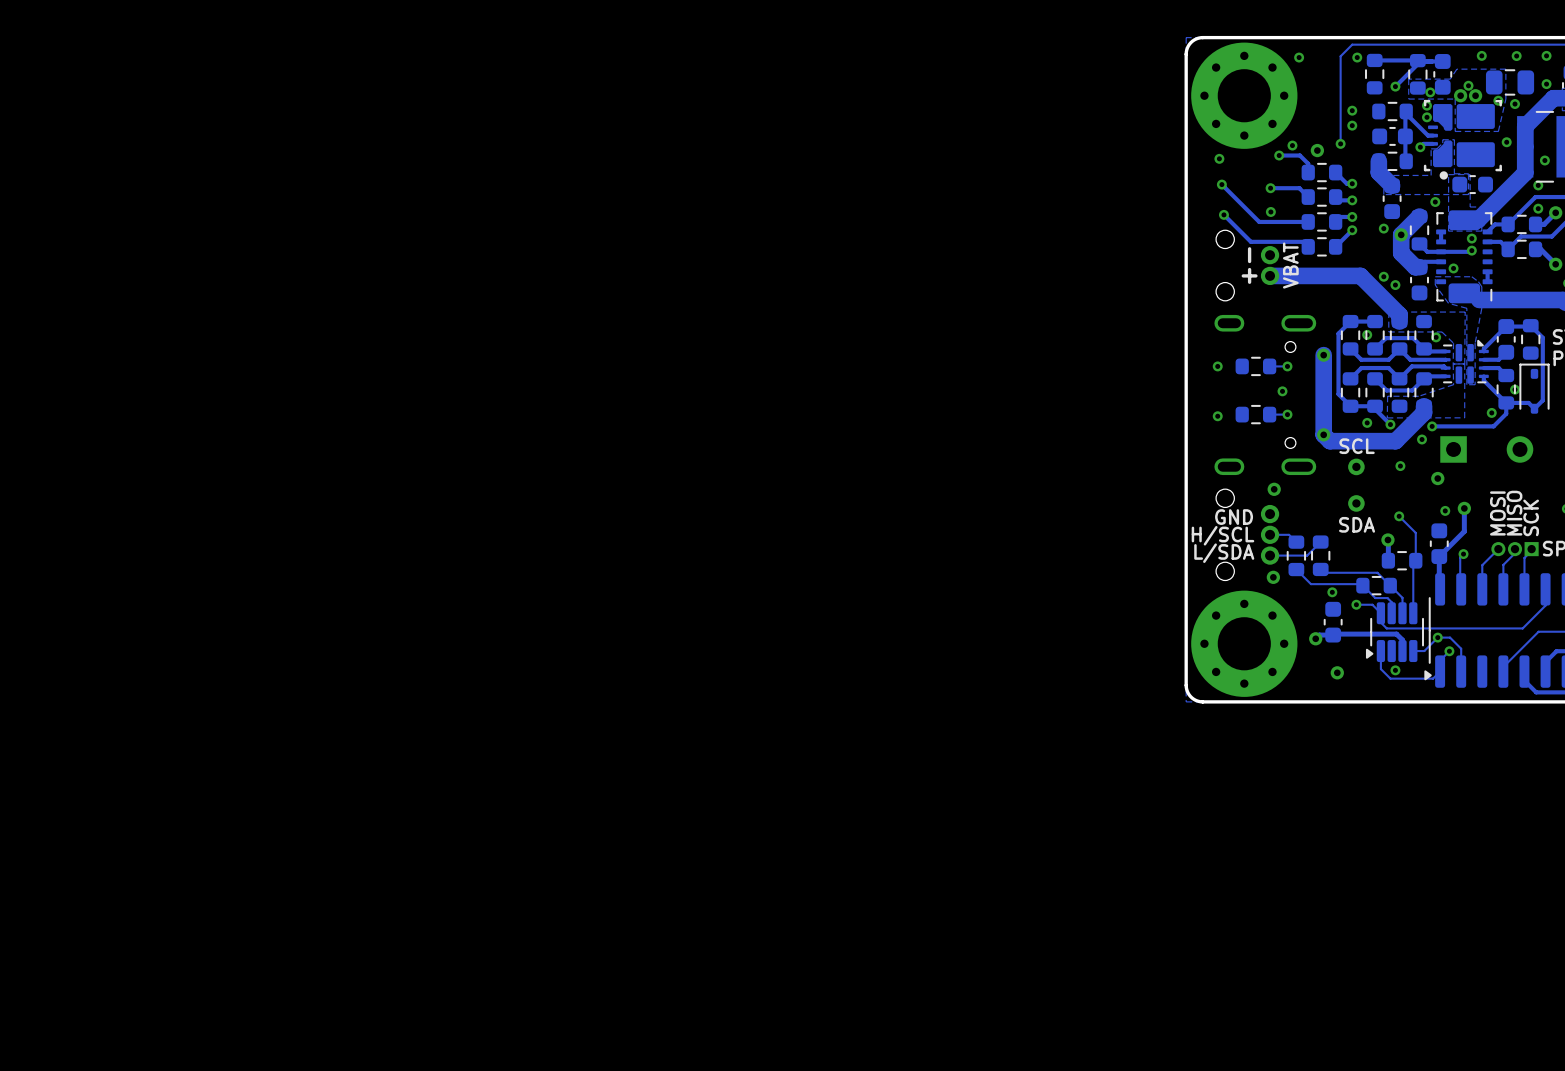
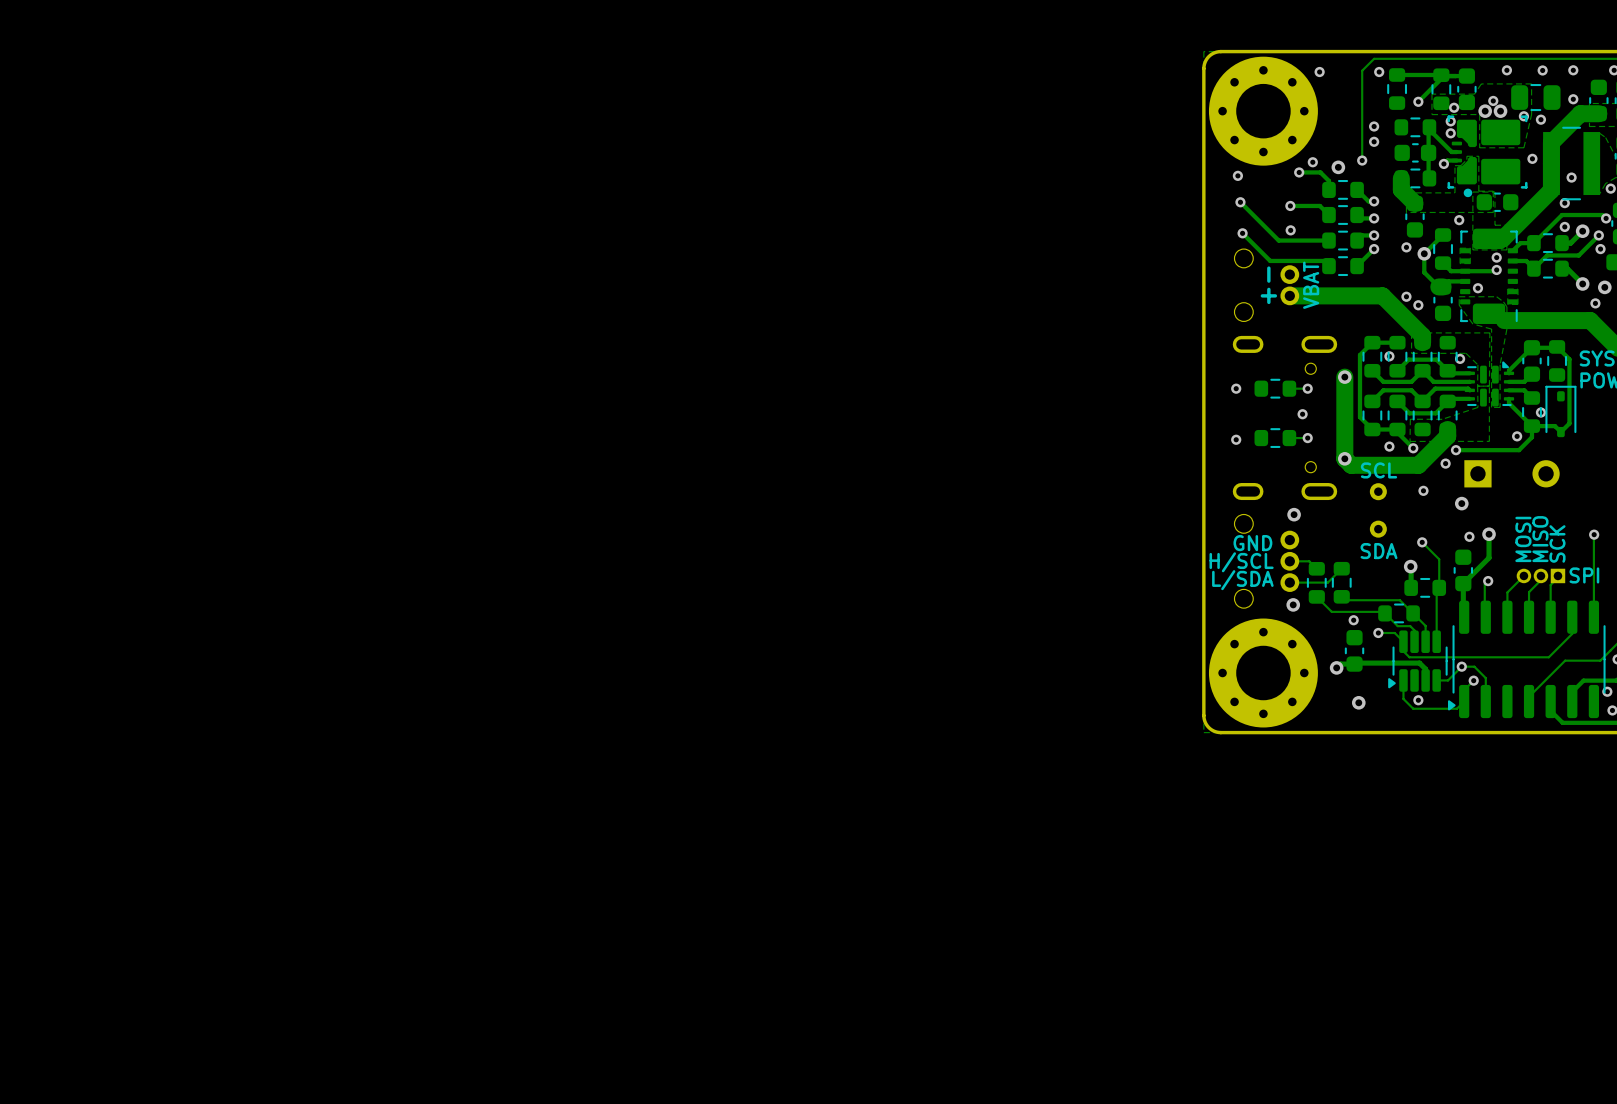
track width: thick (1419, 216) (1401, 234) (1401, 253) (1415, 267) -> thin (1443, 235) (1424, 253) (1424, 272) (1438, 286)
zone outline: none -> (1470, 248) (1470, 263) (1460, 263) (1460, 248) (1470, 248)
track: (1441, 231) (1441, 241) -> none
zone outline: none -> (1517, 289) (1517, 304) (1507, 304) (1507, 289) (1517, 289)
track: (1487, 271) (1487, 281) -> none

